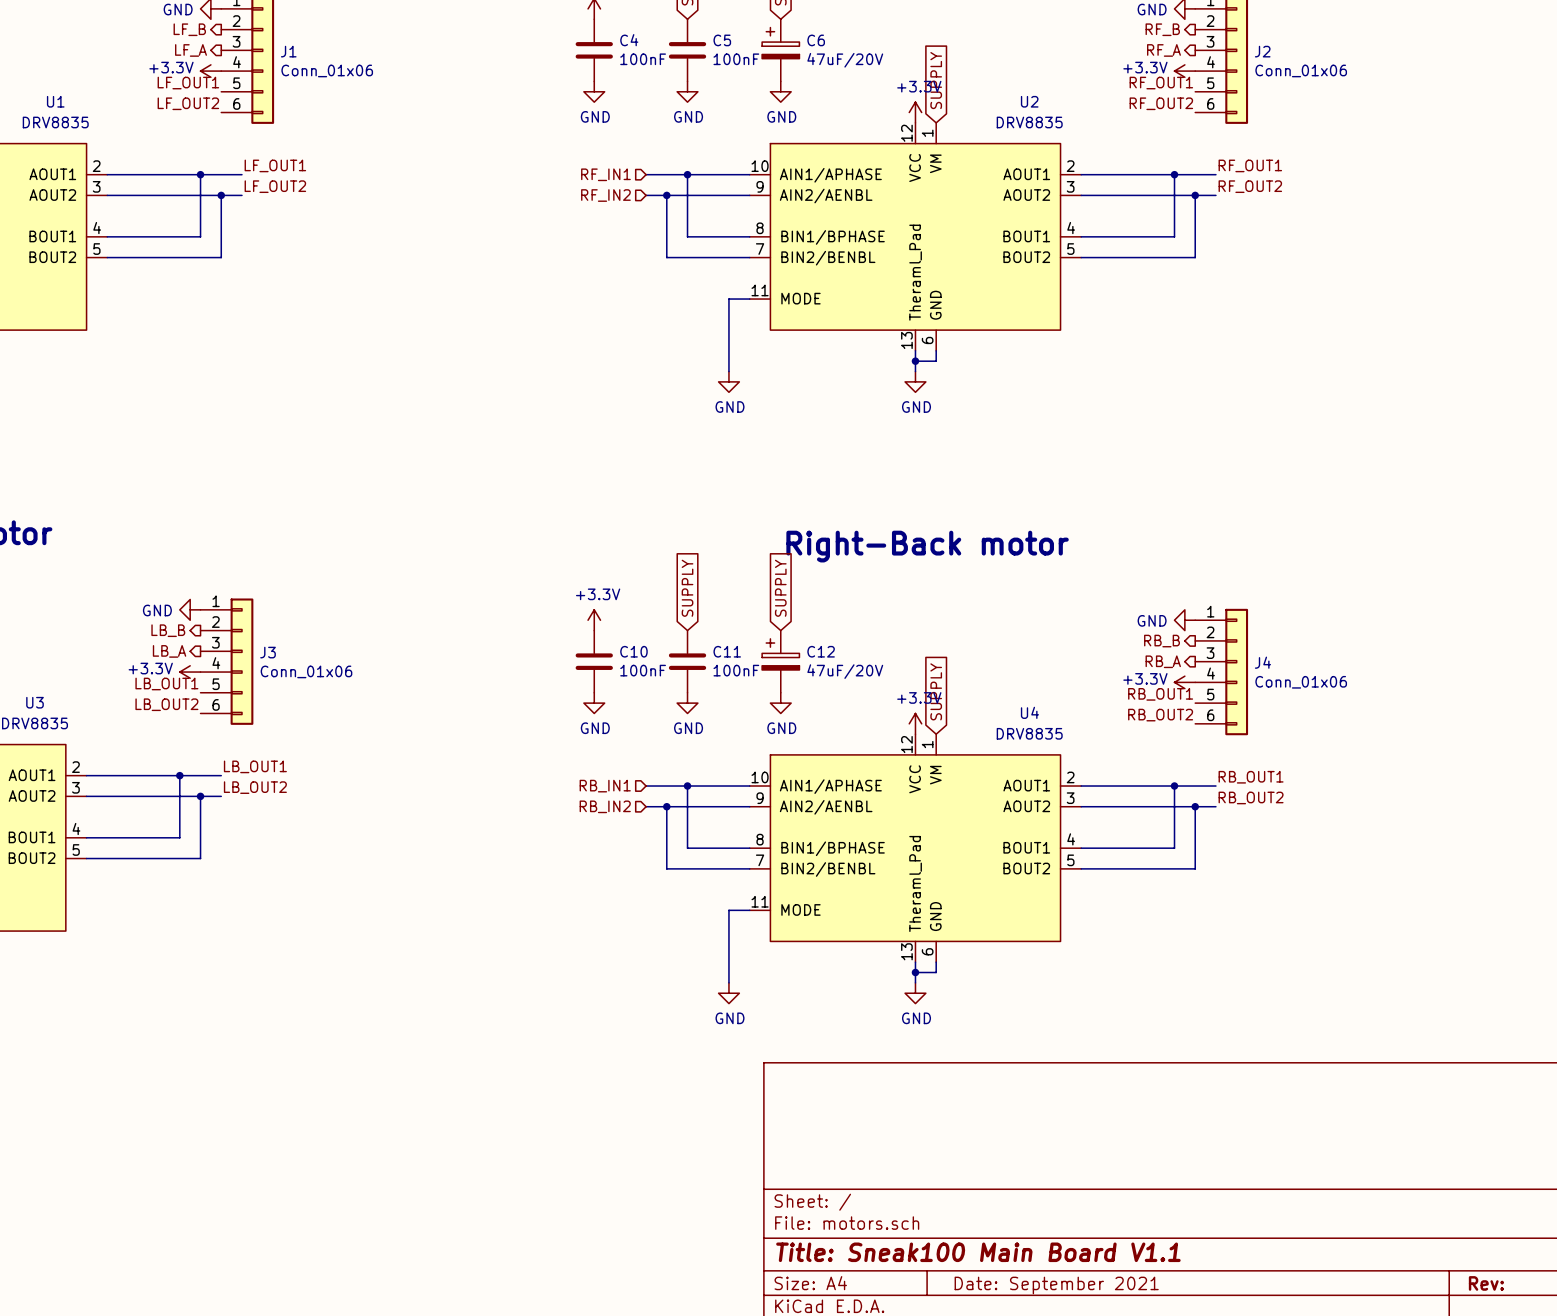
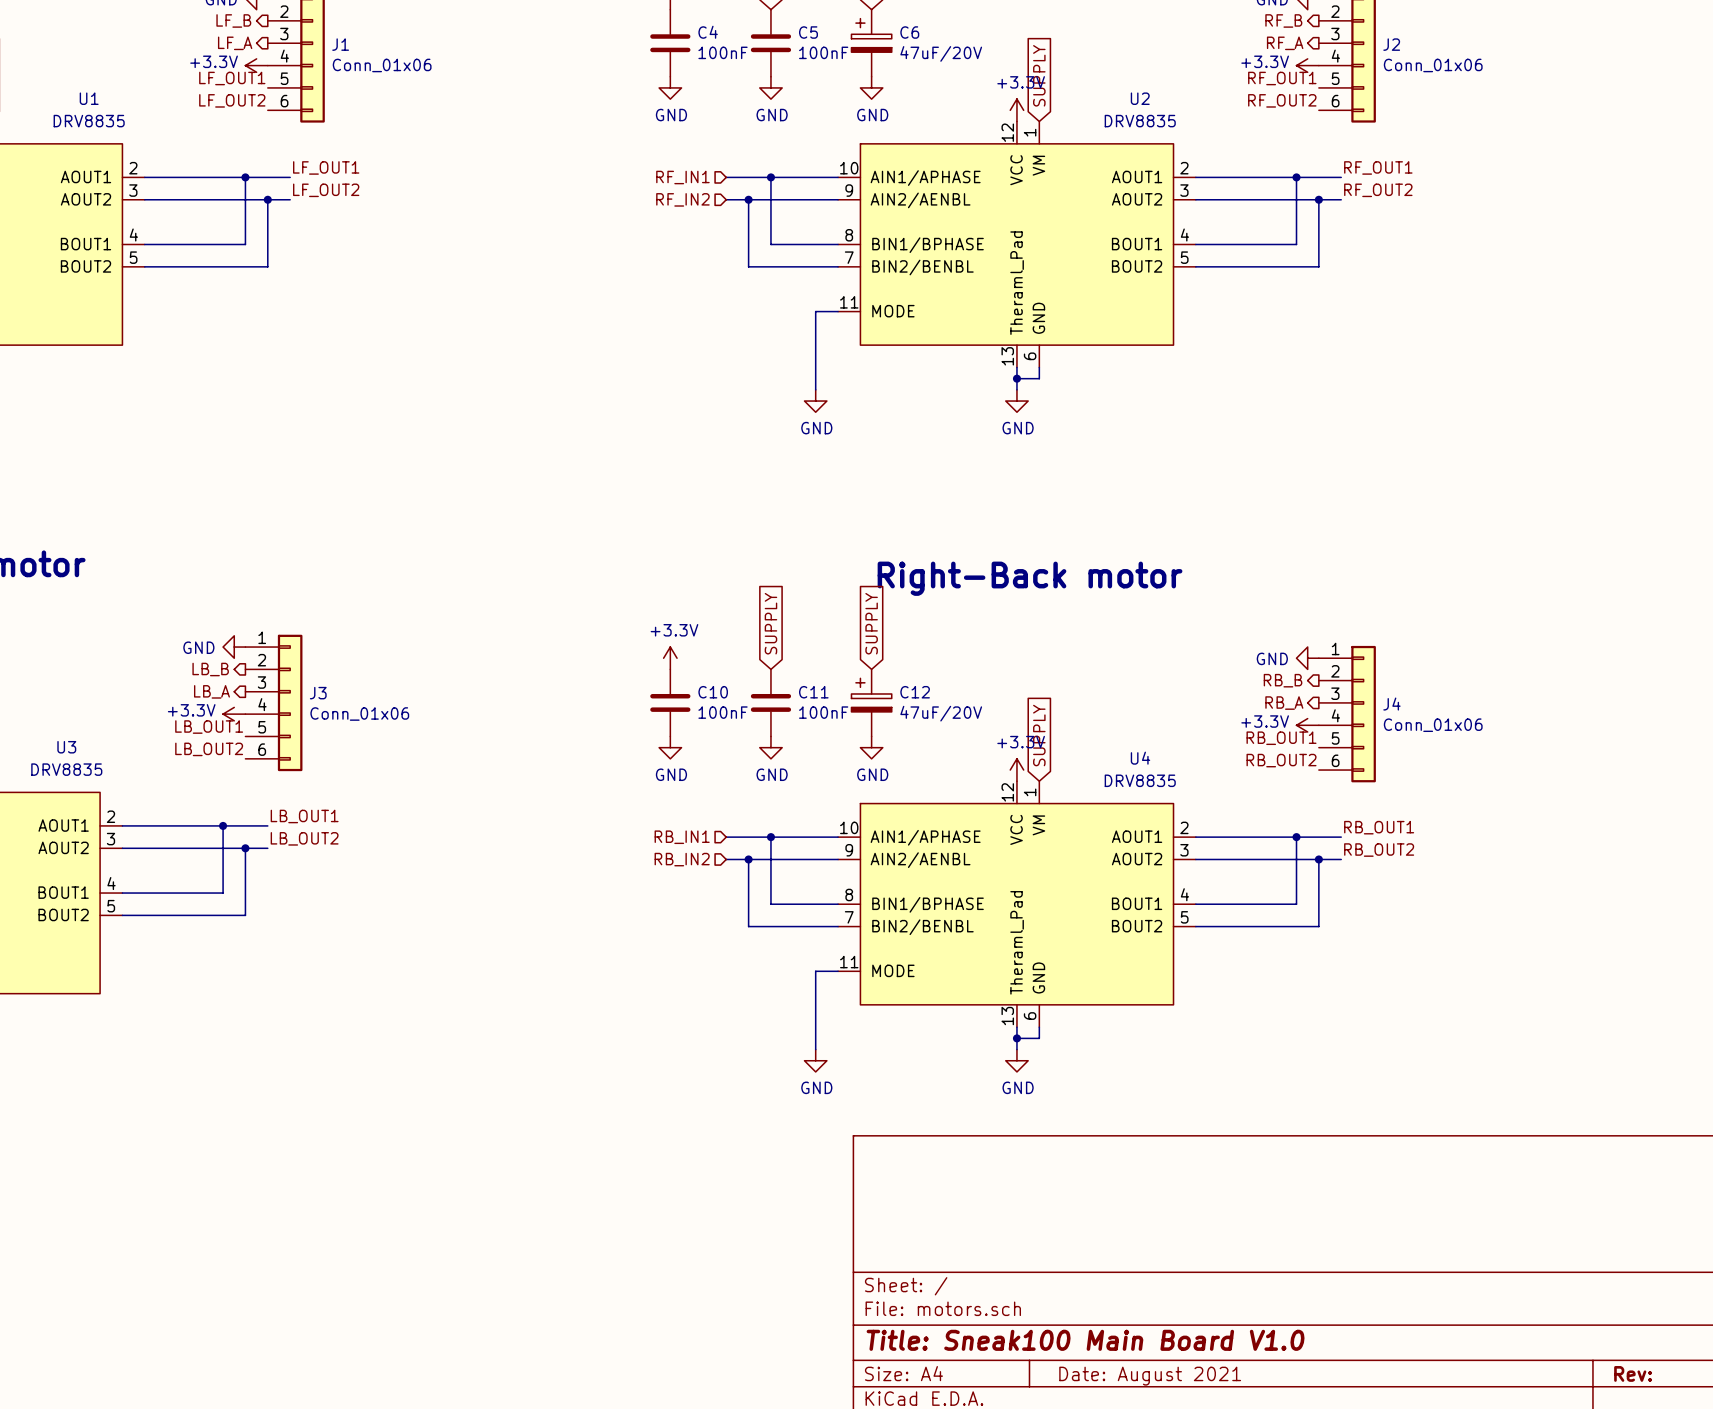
title block: Title: Sneak100 Main Board V1.1 (978, 1252) -> Title: Sneak100 Main Board V1.0 (1085, 1340)
title block: Date: September 2021 (1056, 1285) -> Date: August 2021 (1150, 1376)

